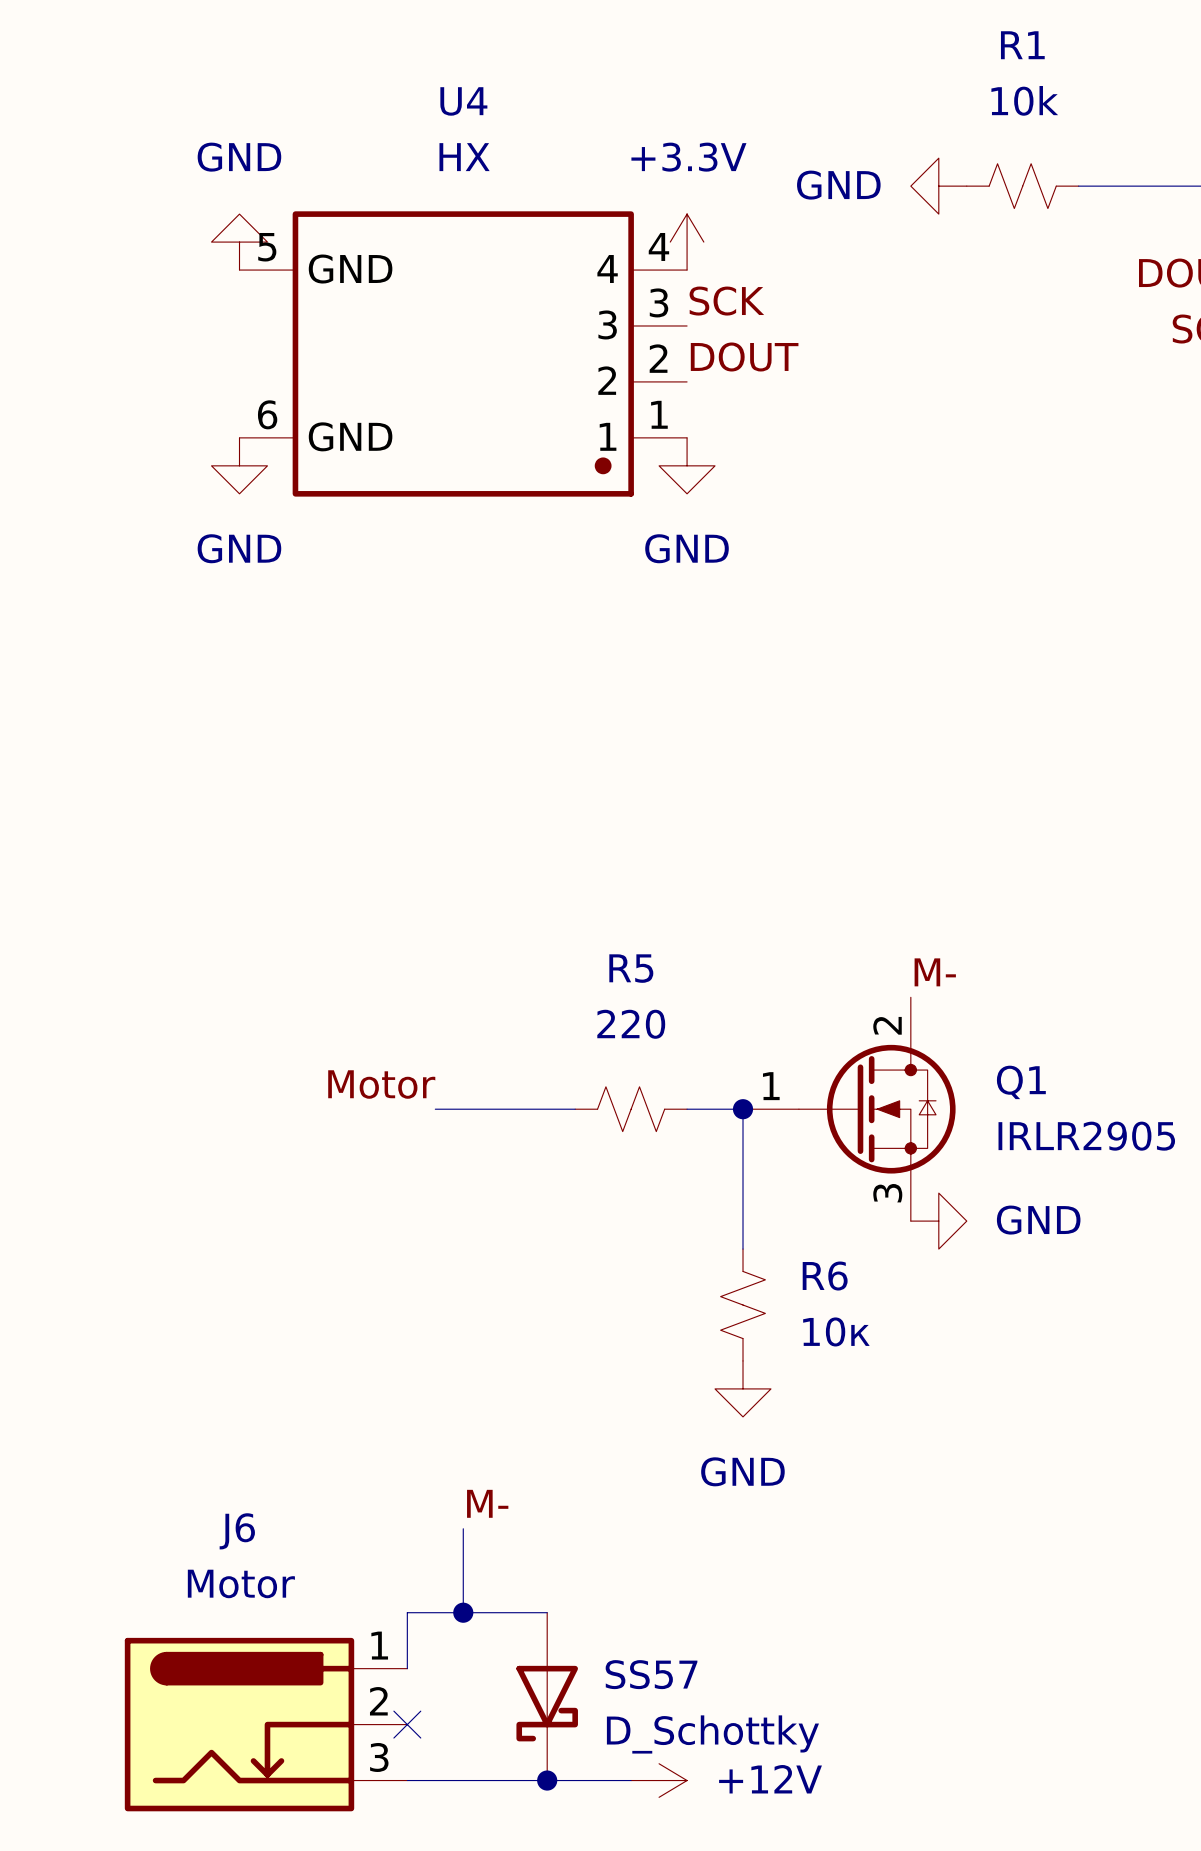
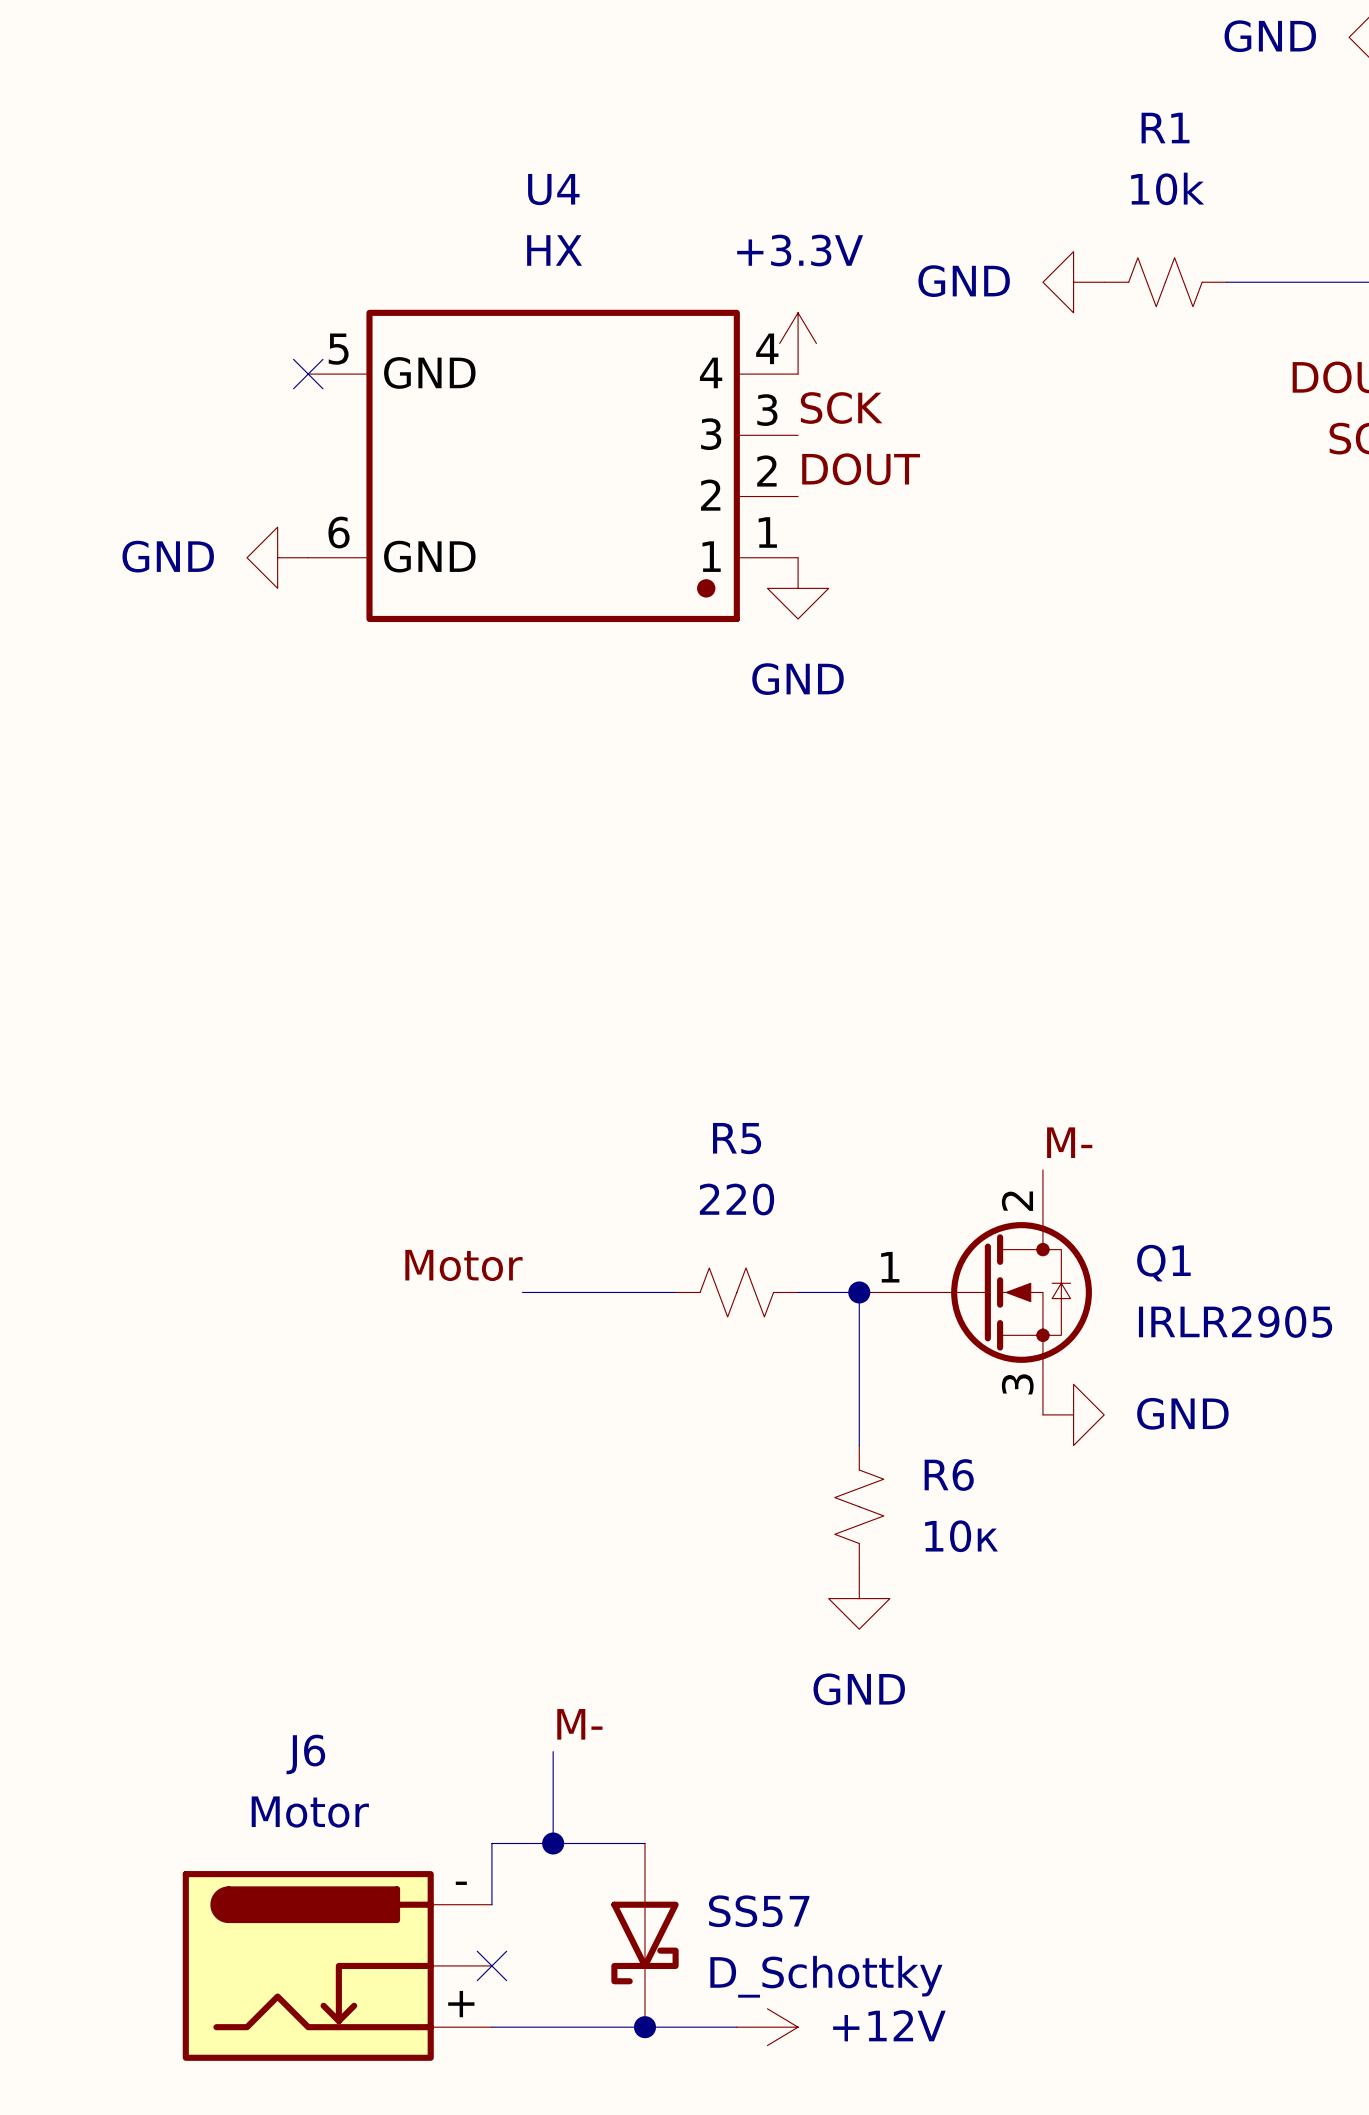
power symbol: GND (239, 242) -> none
no-connect mark: none -> (308, 374)
power symbol rotation: 0° (239, 465) -> 90° clockwise (277, 557)
power symbol position: GND (239, 465) -> GND (277, 557)
J6 pin number: 1 (379, 1645) -> - (461, 1883)
J6 pin number: 2 (378, 1701) -> none
J6 pin number: 3 (379, 1757) -> + (461, 2004)

